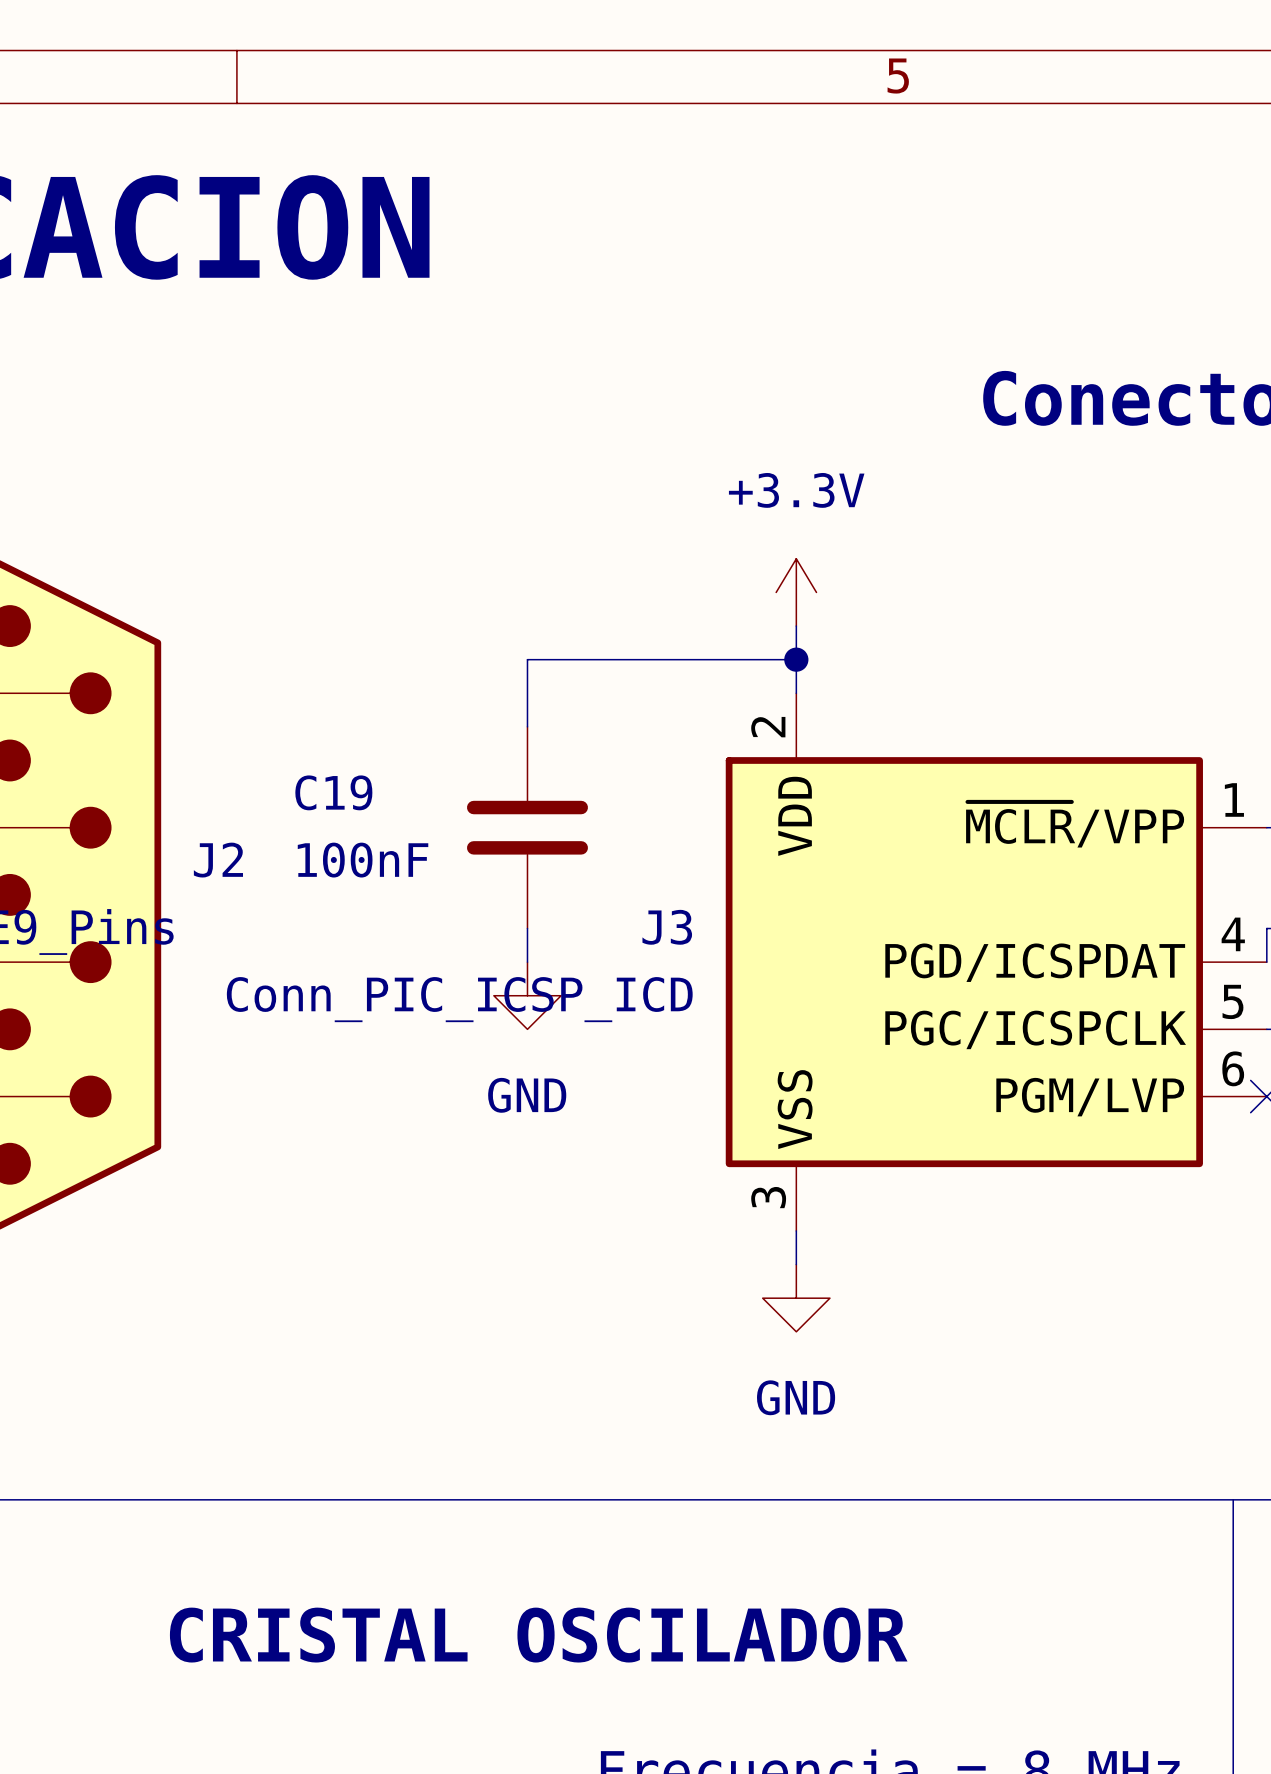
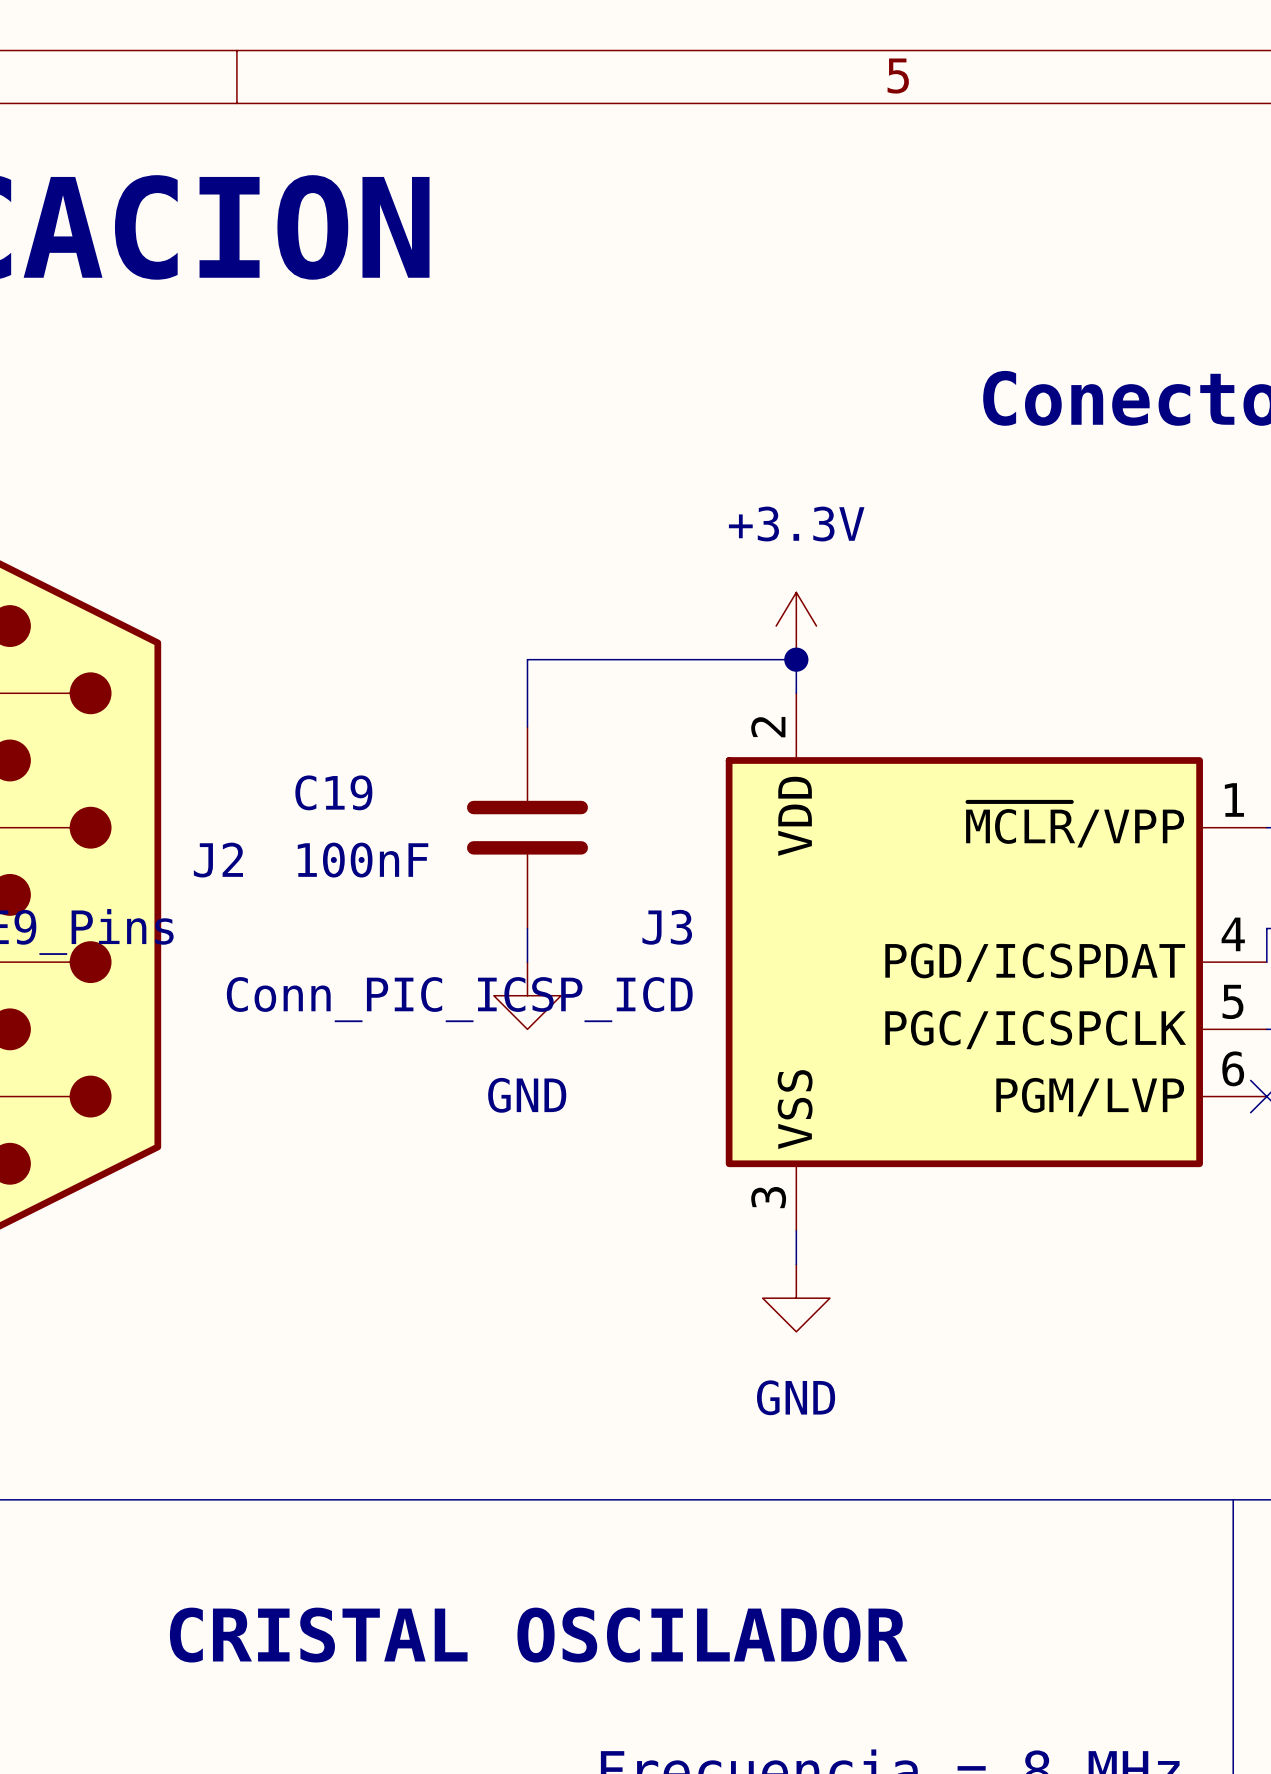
power symbol position: +3.3V (796, 592) -> +3.3V (796, 626)

